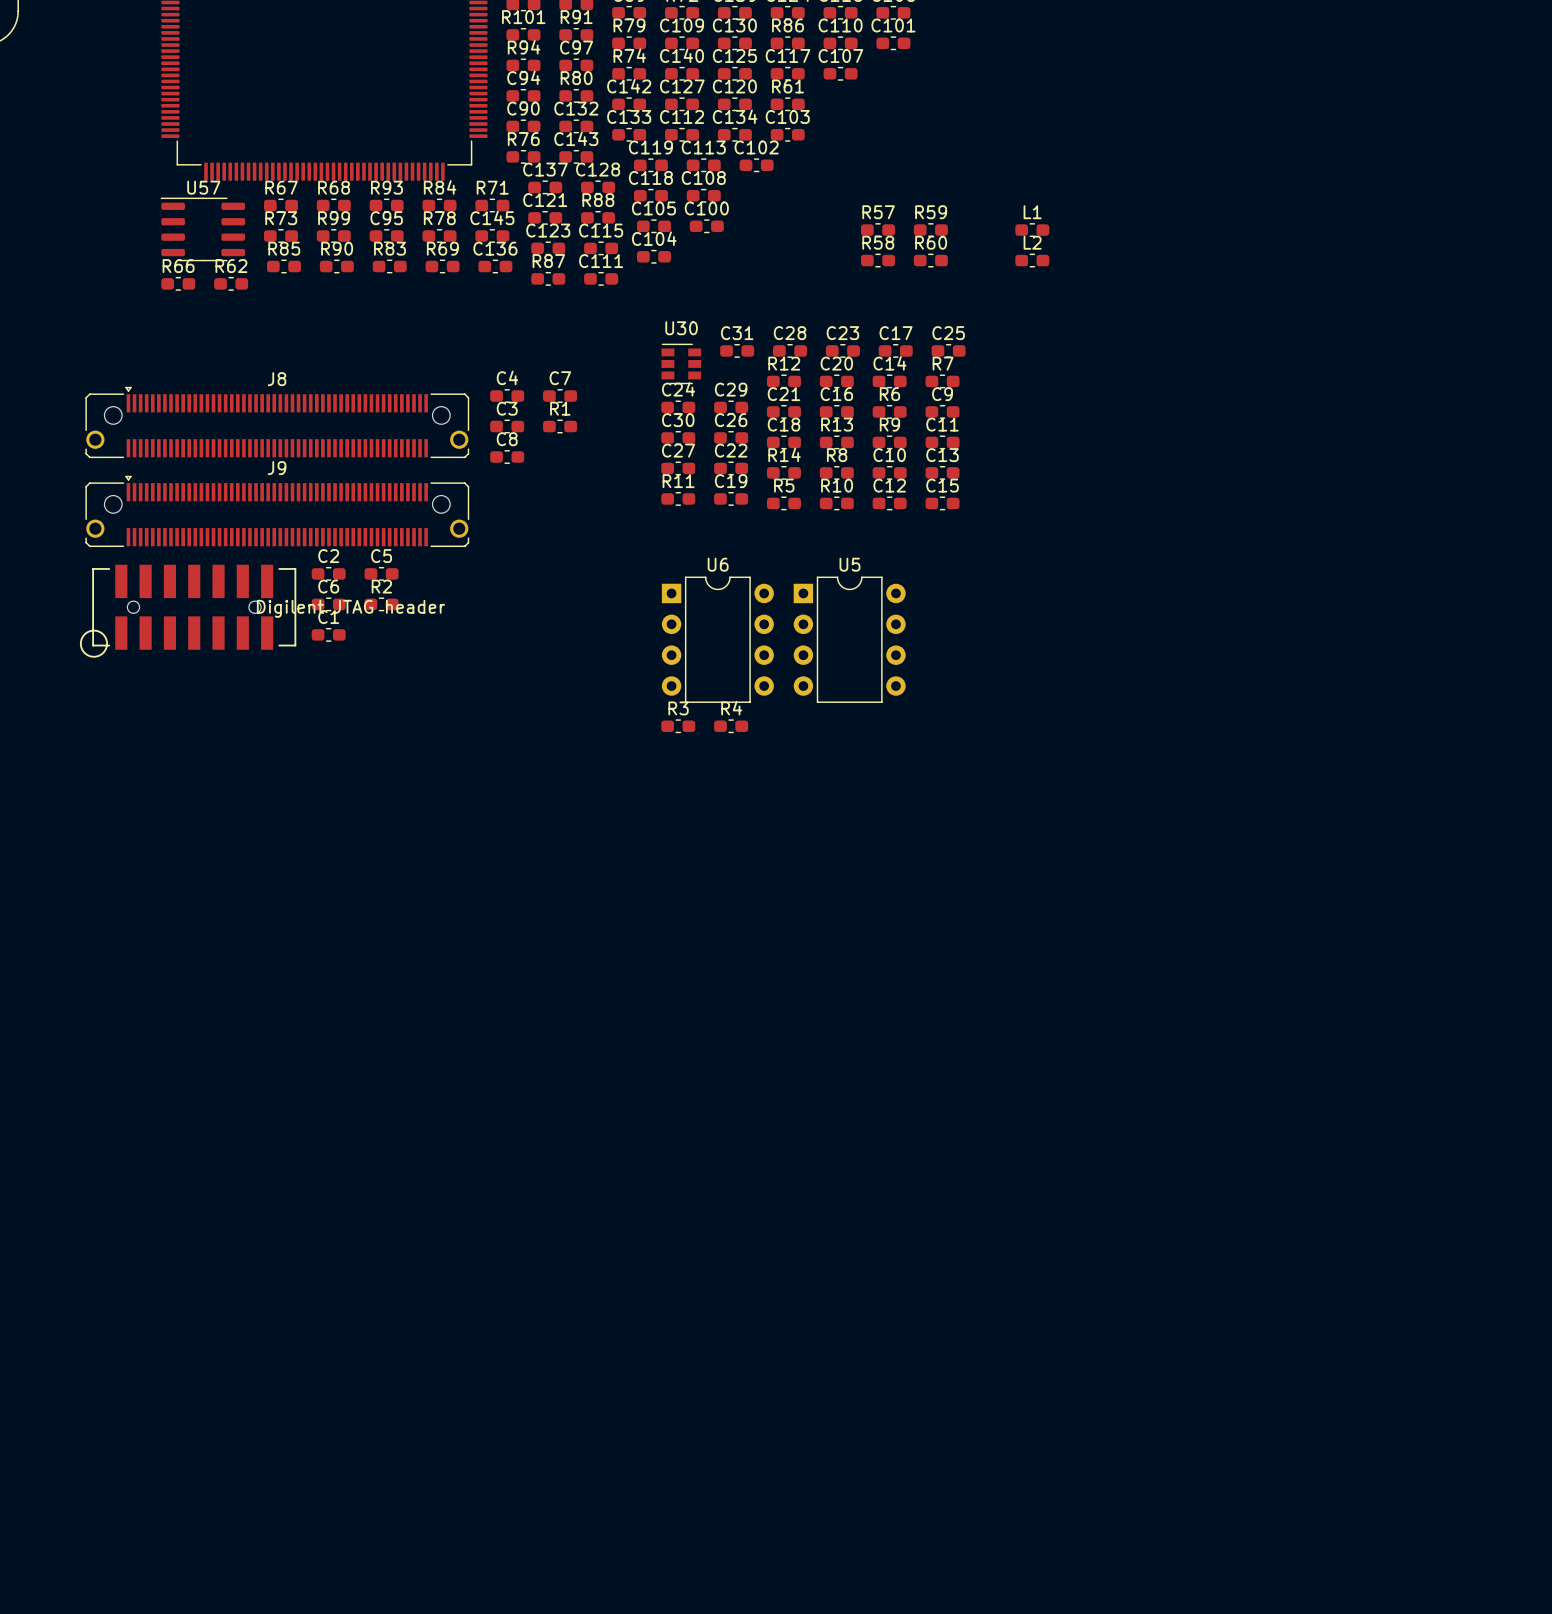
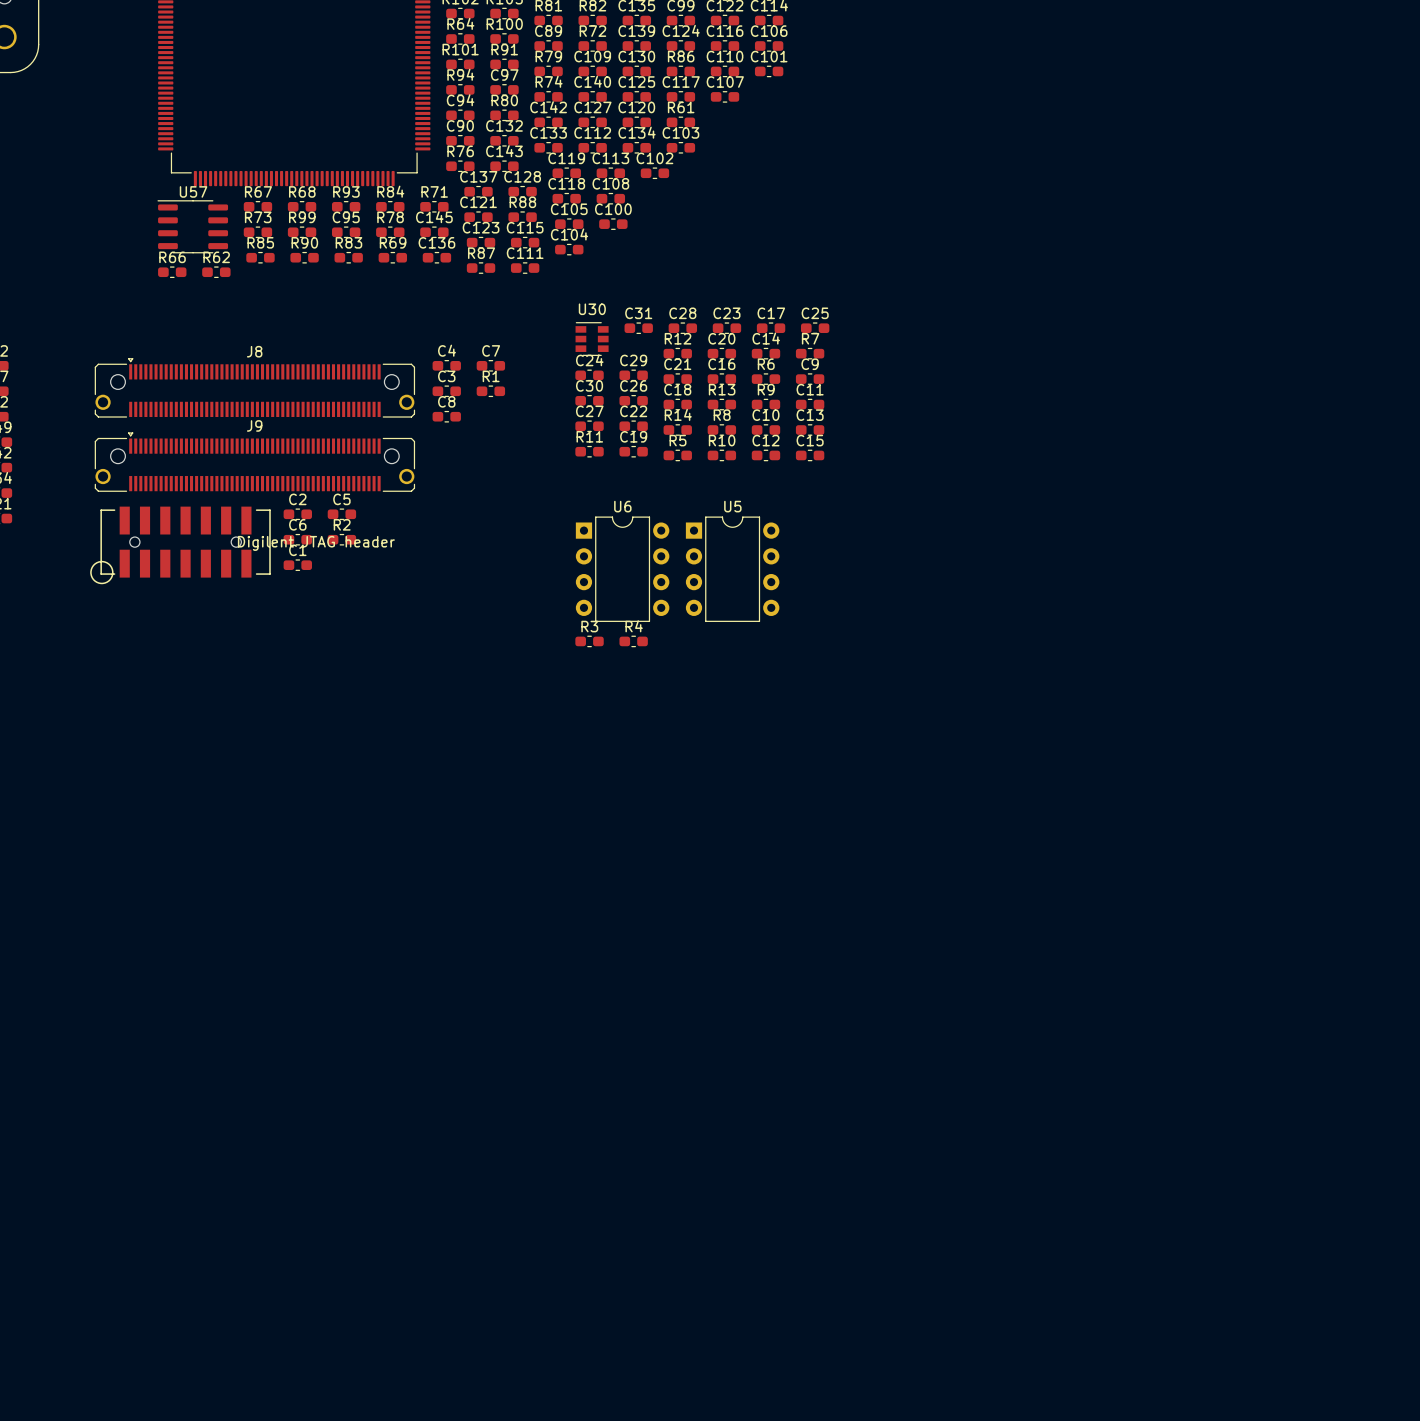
R57: (878, 230) -> none
R59: (930, 230) -> none
L1: (1032, 230) -> none
R58: (878, 260) -> none
R60: (930, 260) -> none
L2: (1032, 260) -> none

